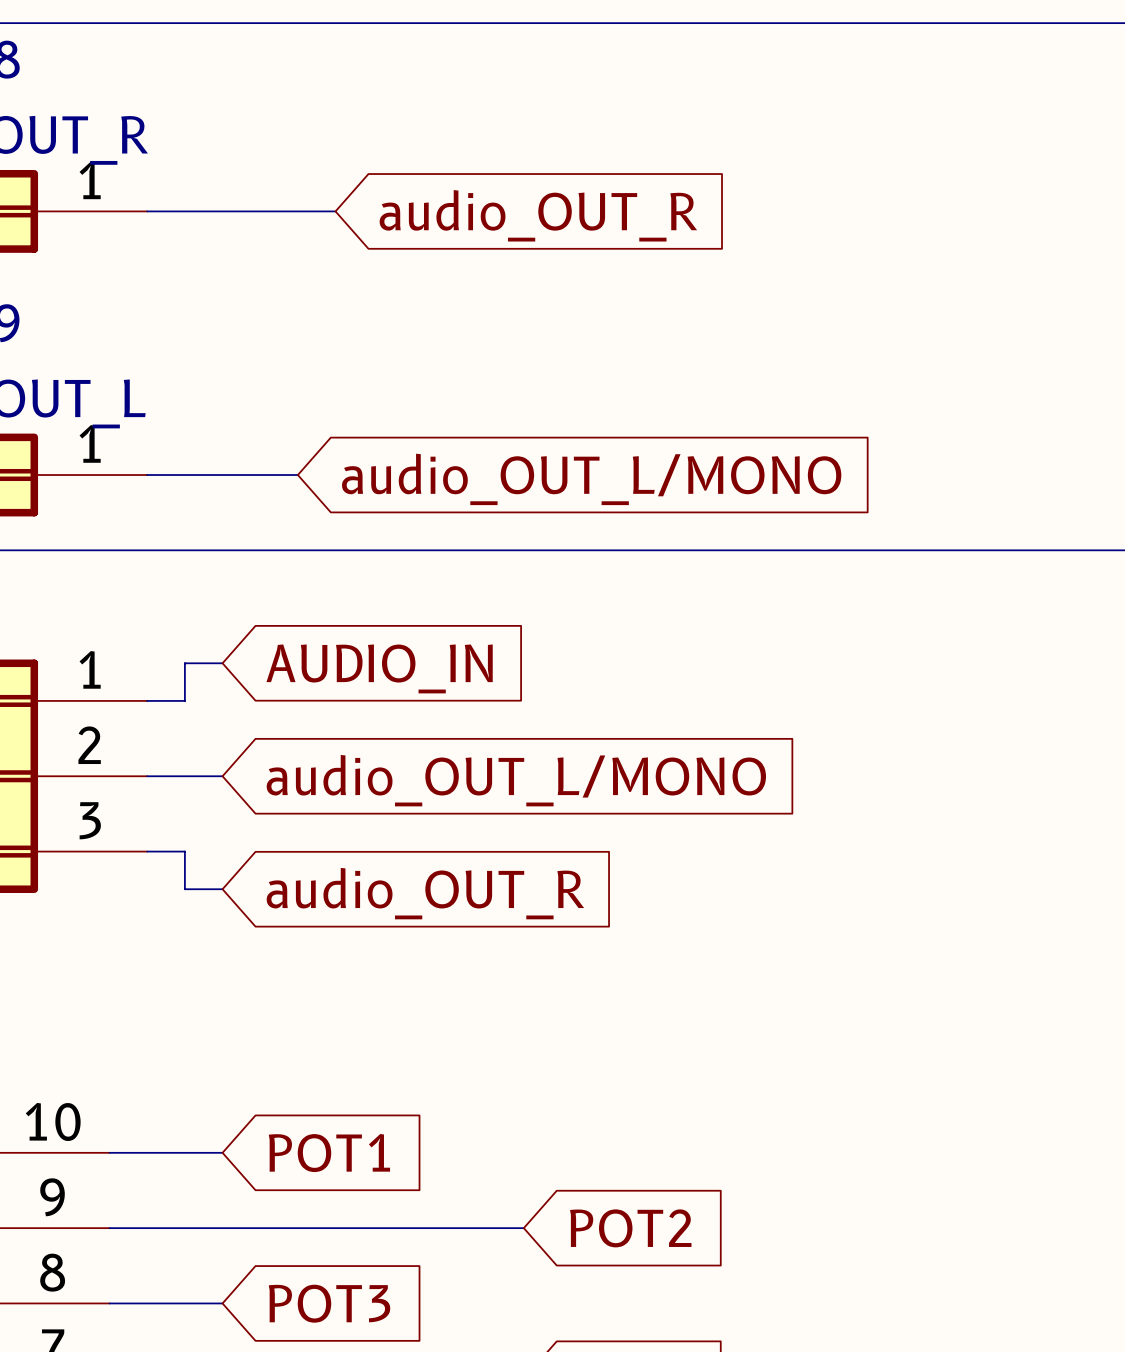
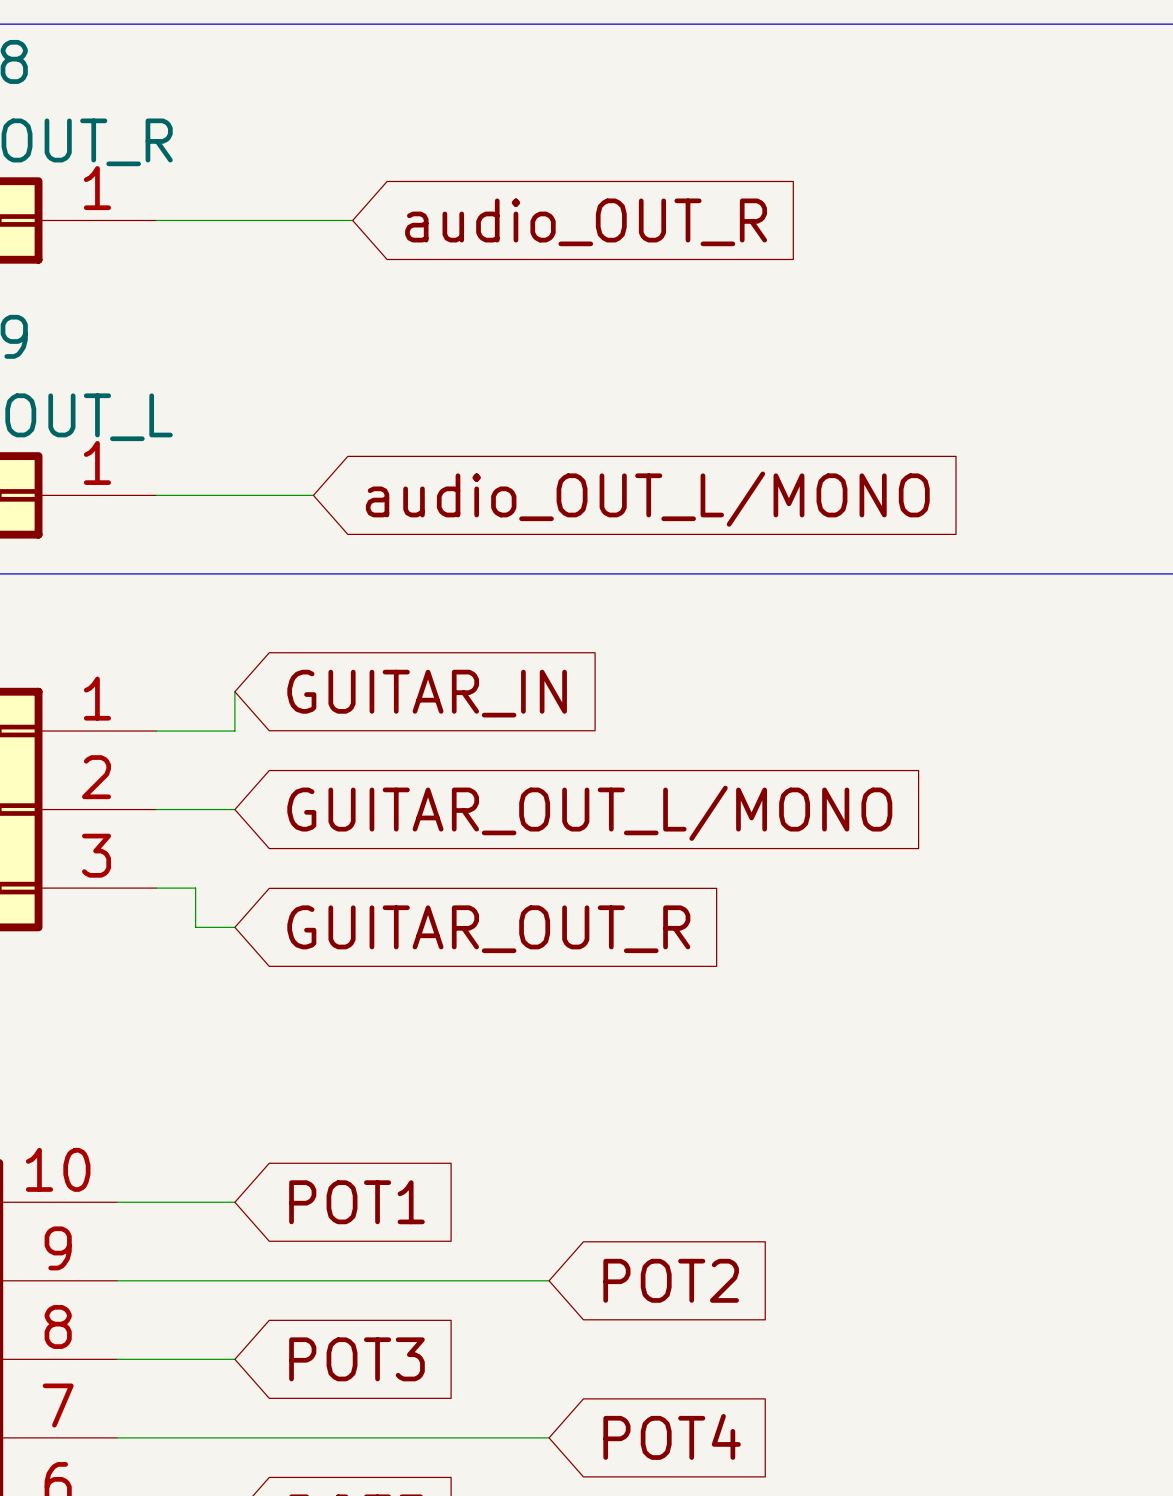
wire: (222, 663) (184, 663) (184, 700) -> (234, 691) (234, 731) (195, 731)
global label: AUDIO_IN (379, 668) -> GUITAR_IN (427, 693)
global label: audio_OUT_L/MONO (516, 780) -> GUITAR_OUT_L/MONO (589, 813)
global label: audio_OUT_R (425, 893) -> GUITAR_OUT_R (488, 929)

